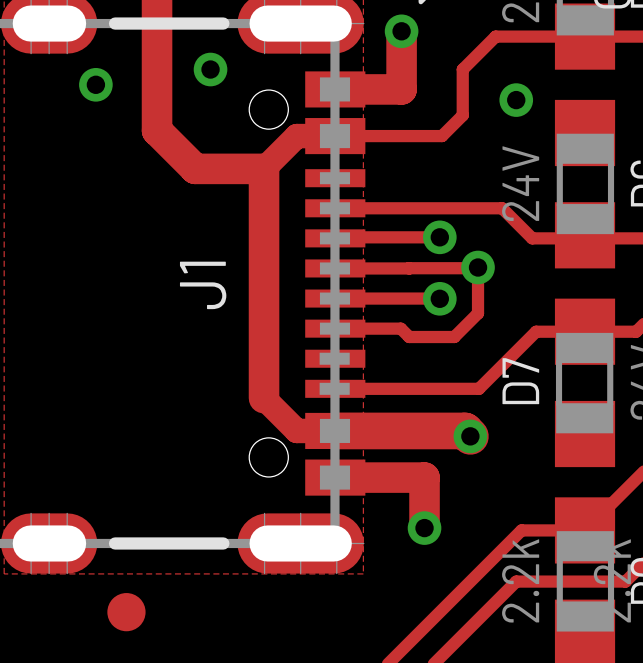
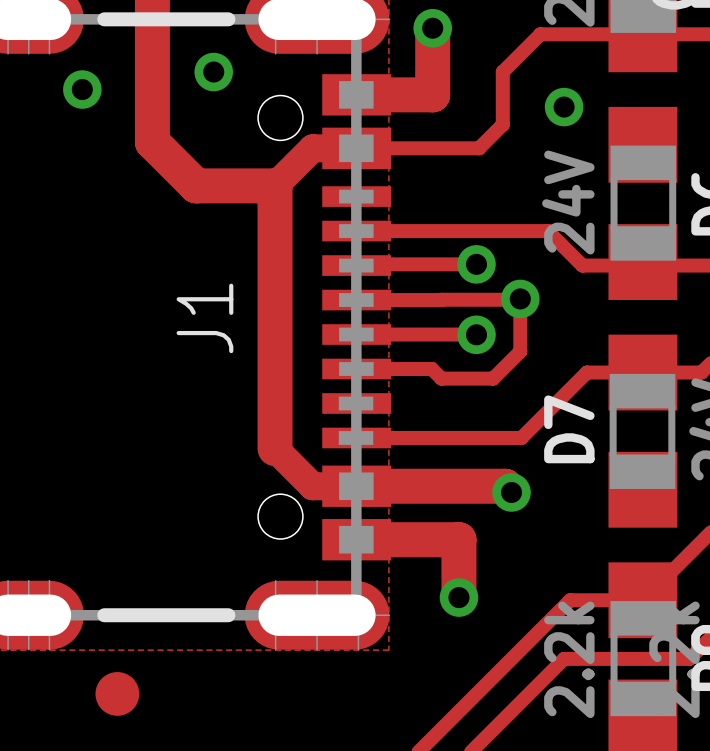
track width: thick (335, 430) (464, 430) (470, 436) -> thin (356, 486) (505, 486) (511, 492)

